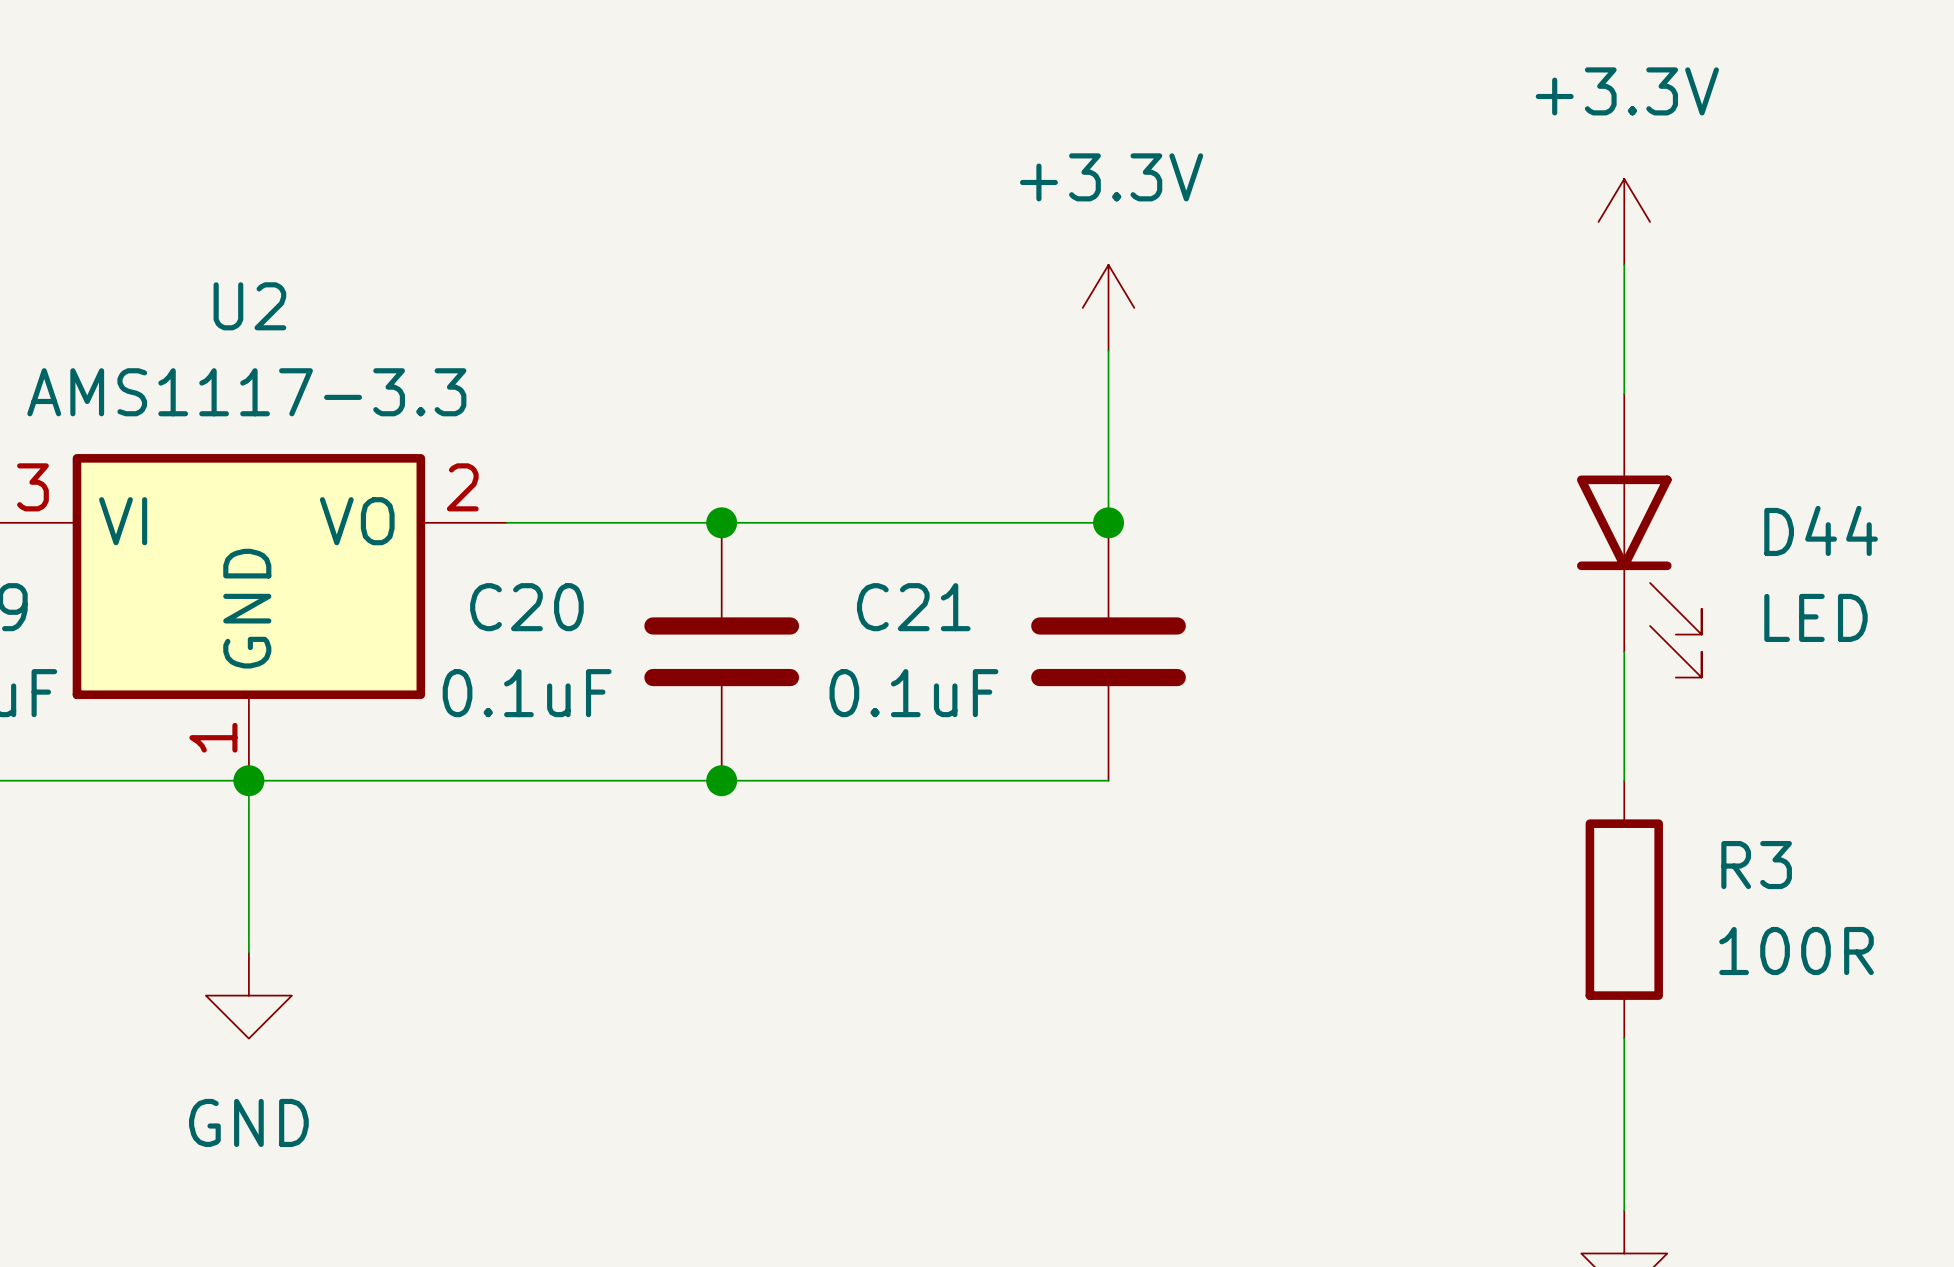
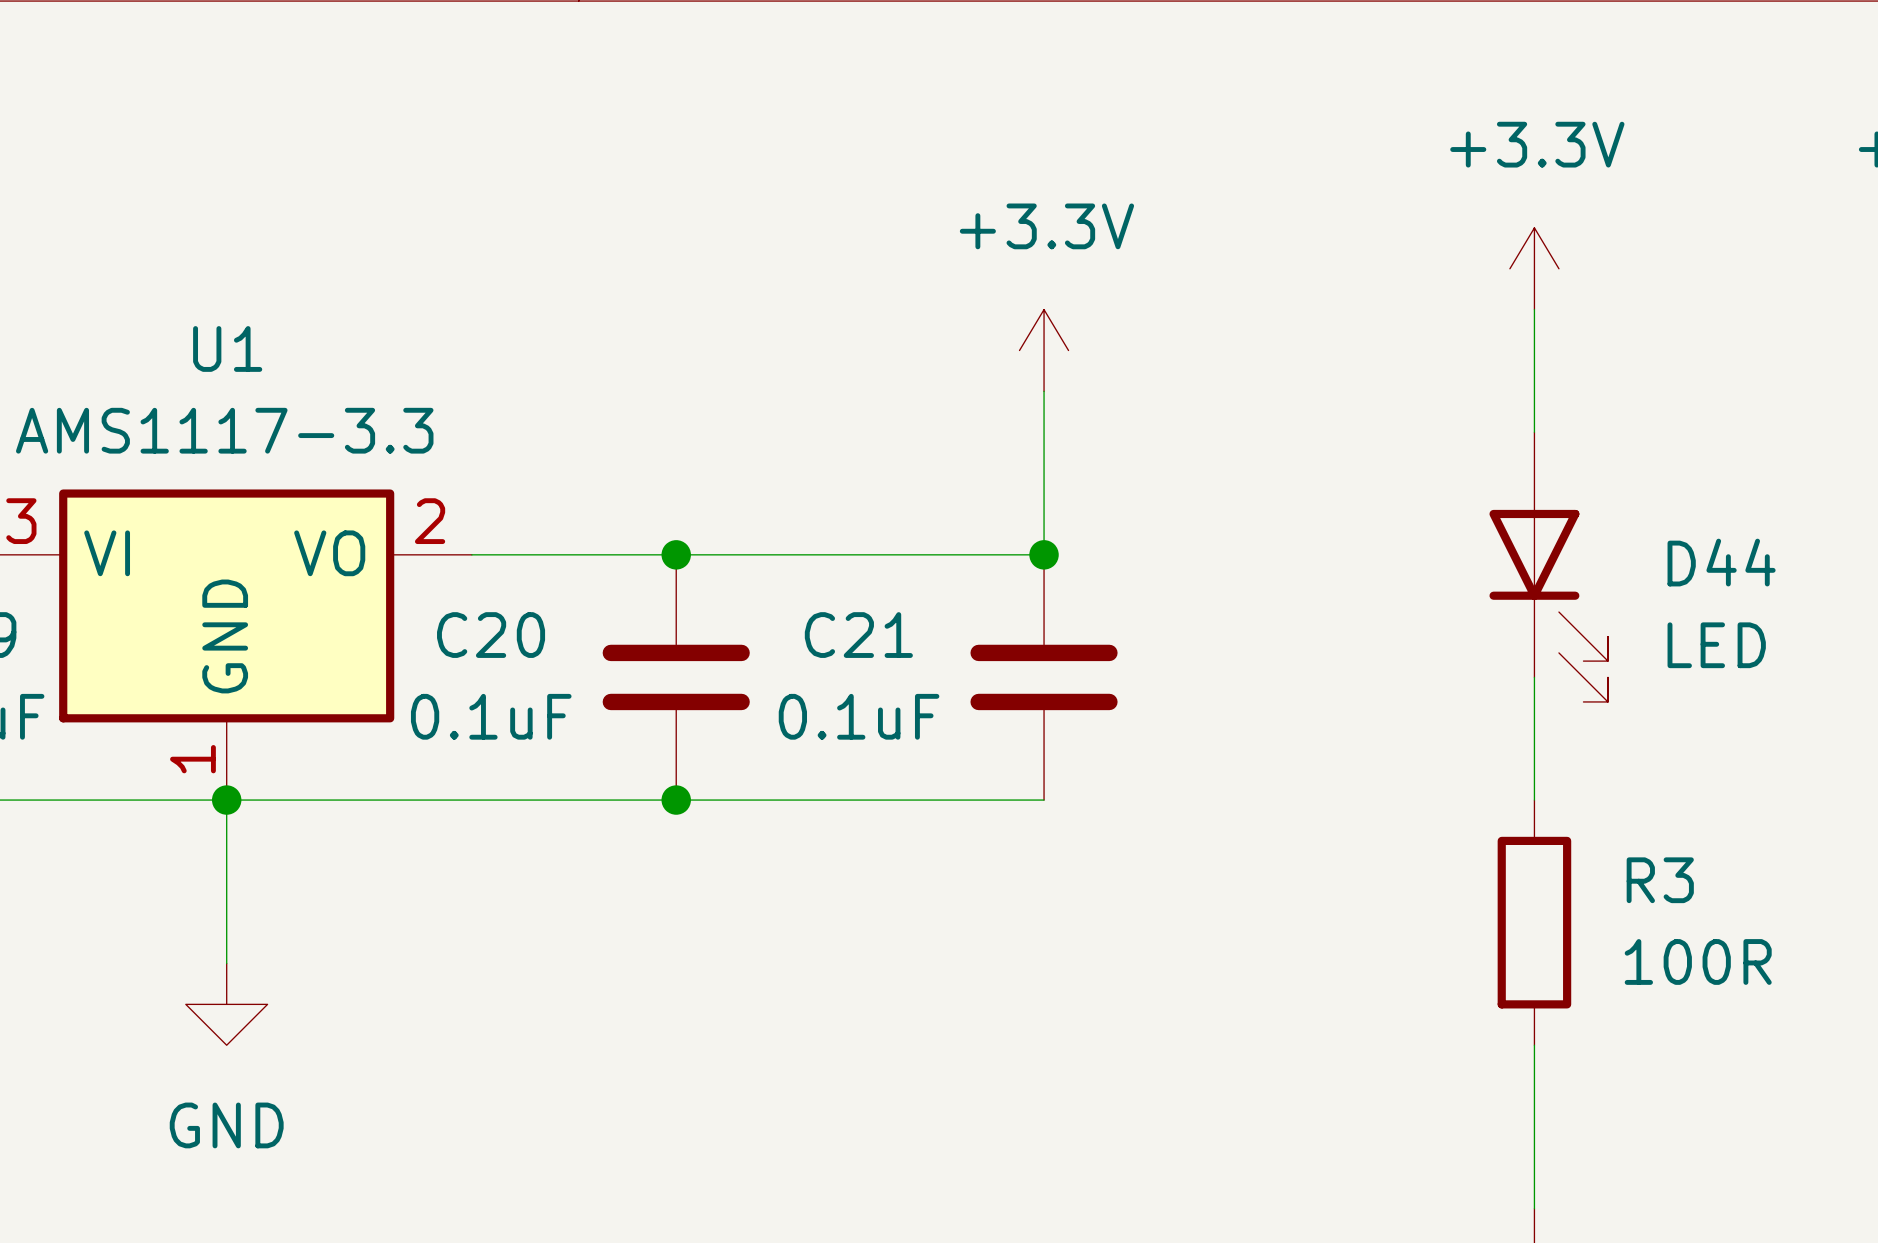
U2 name: U2 (249, 306) -> U1 (227, 348)

